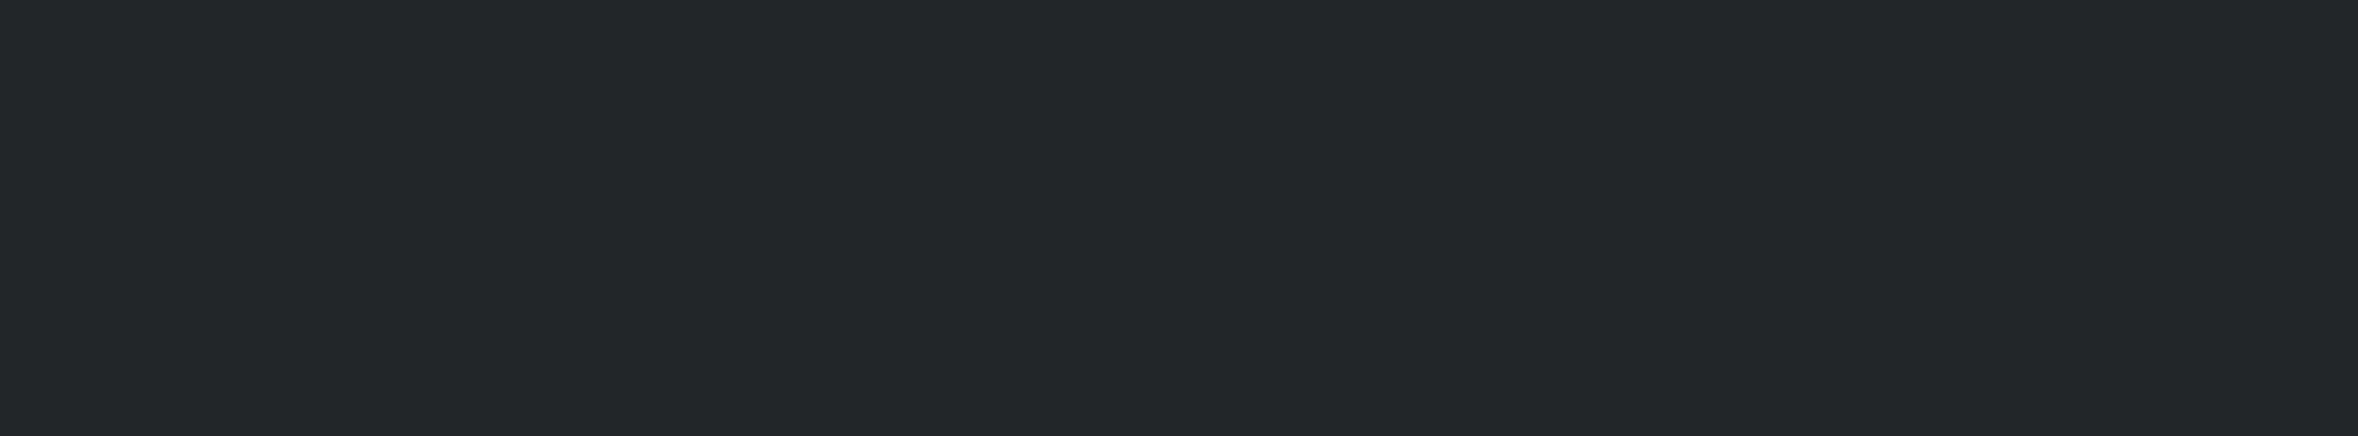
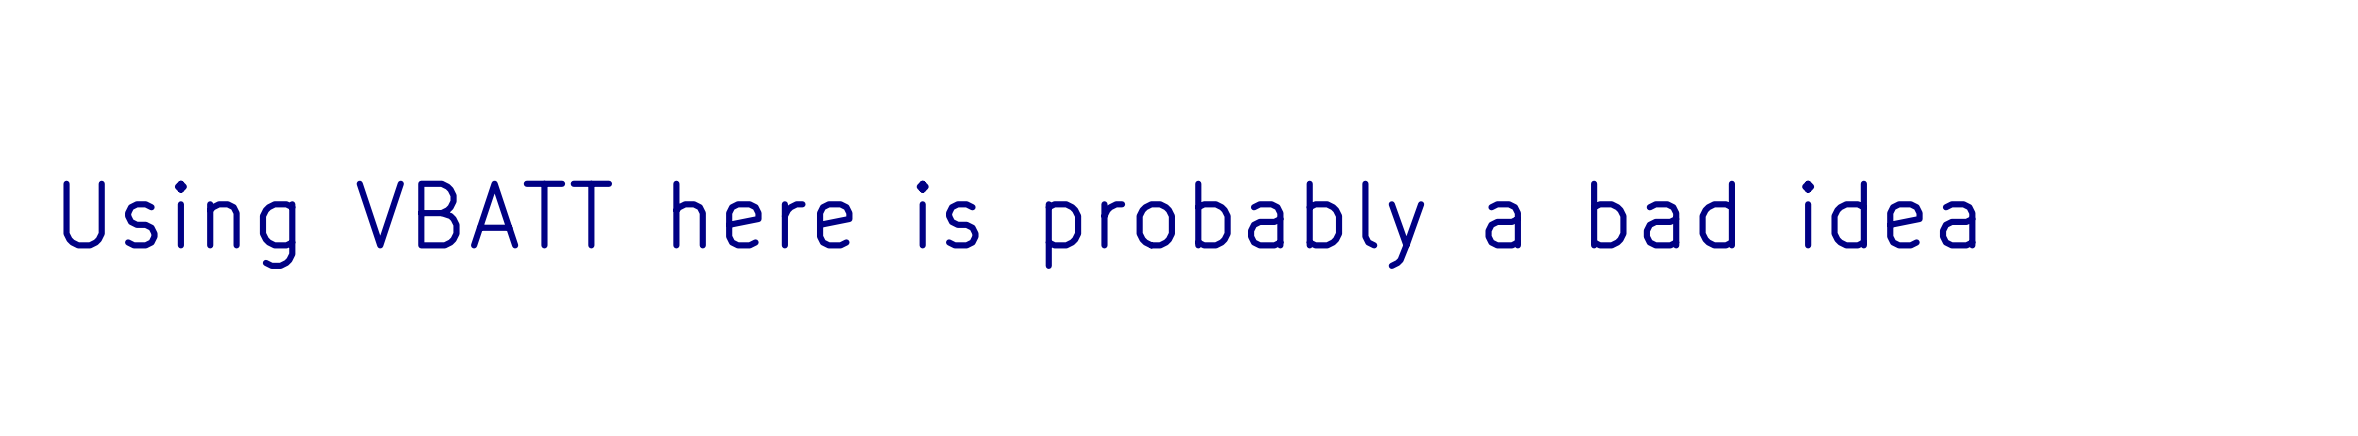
text: none -> Using VBATT here is probably a bad idea (1019, 224)

